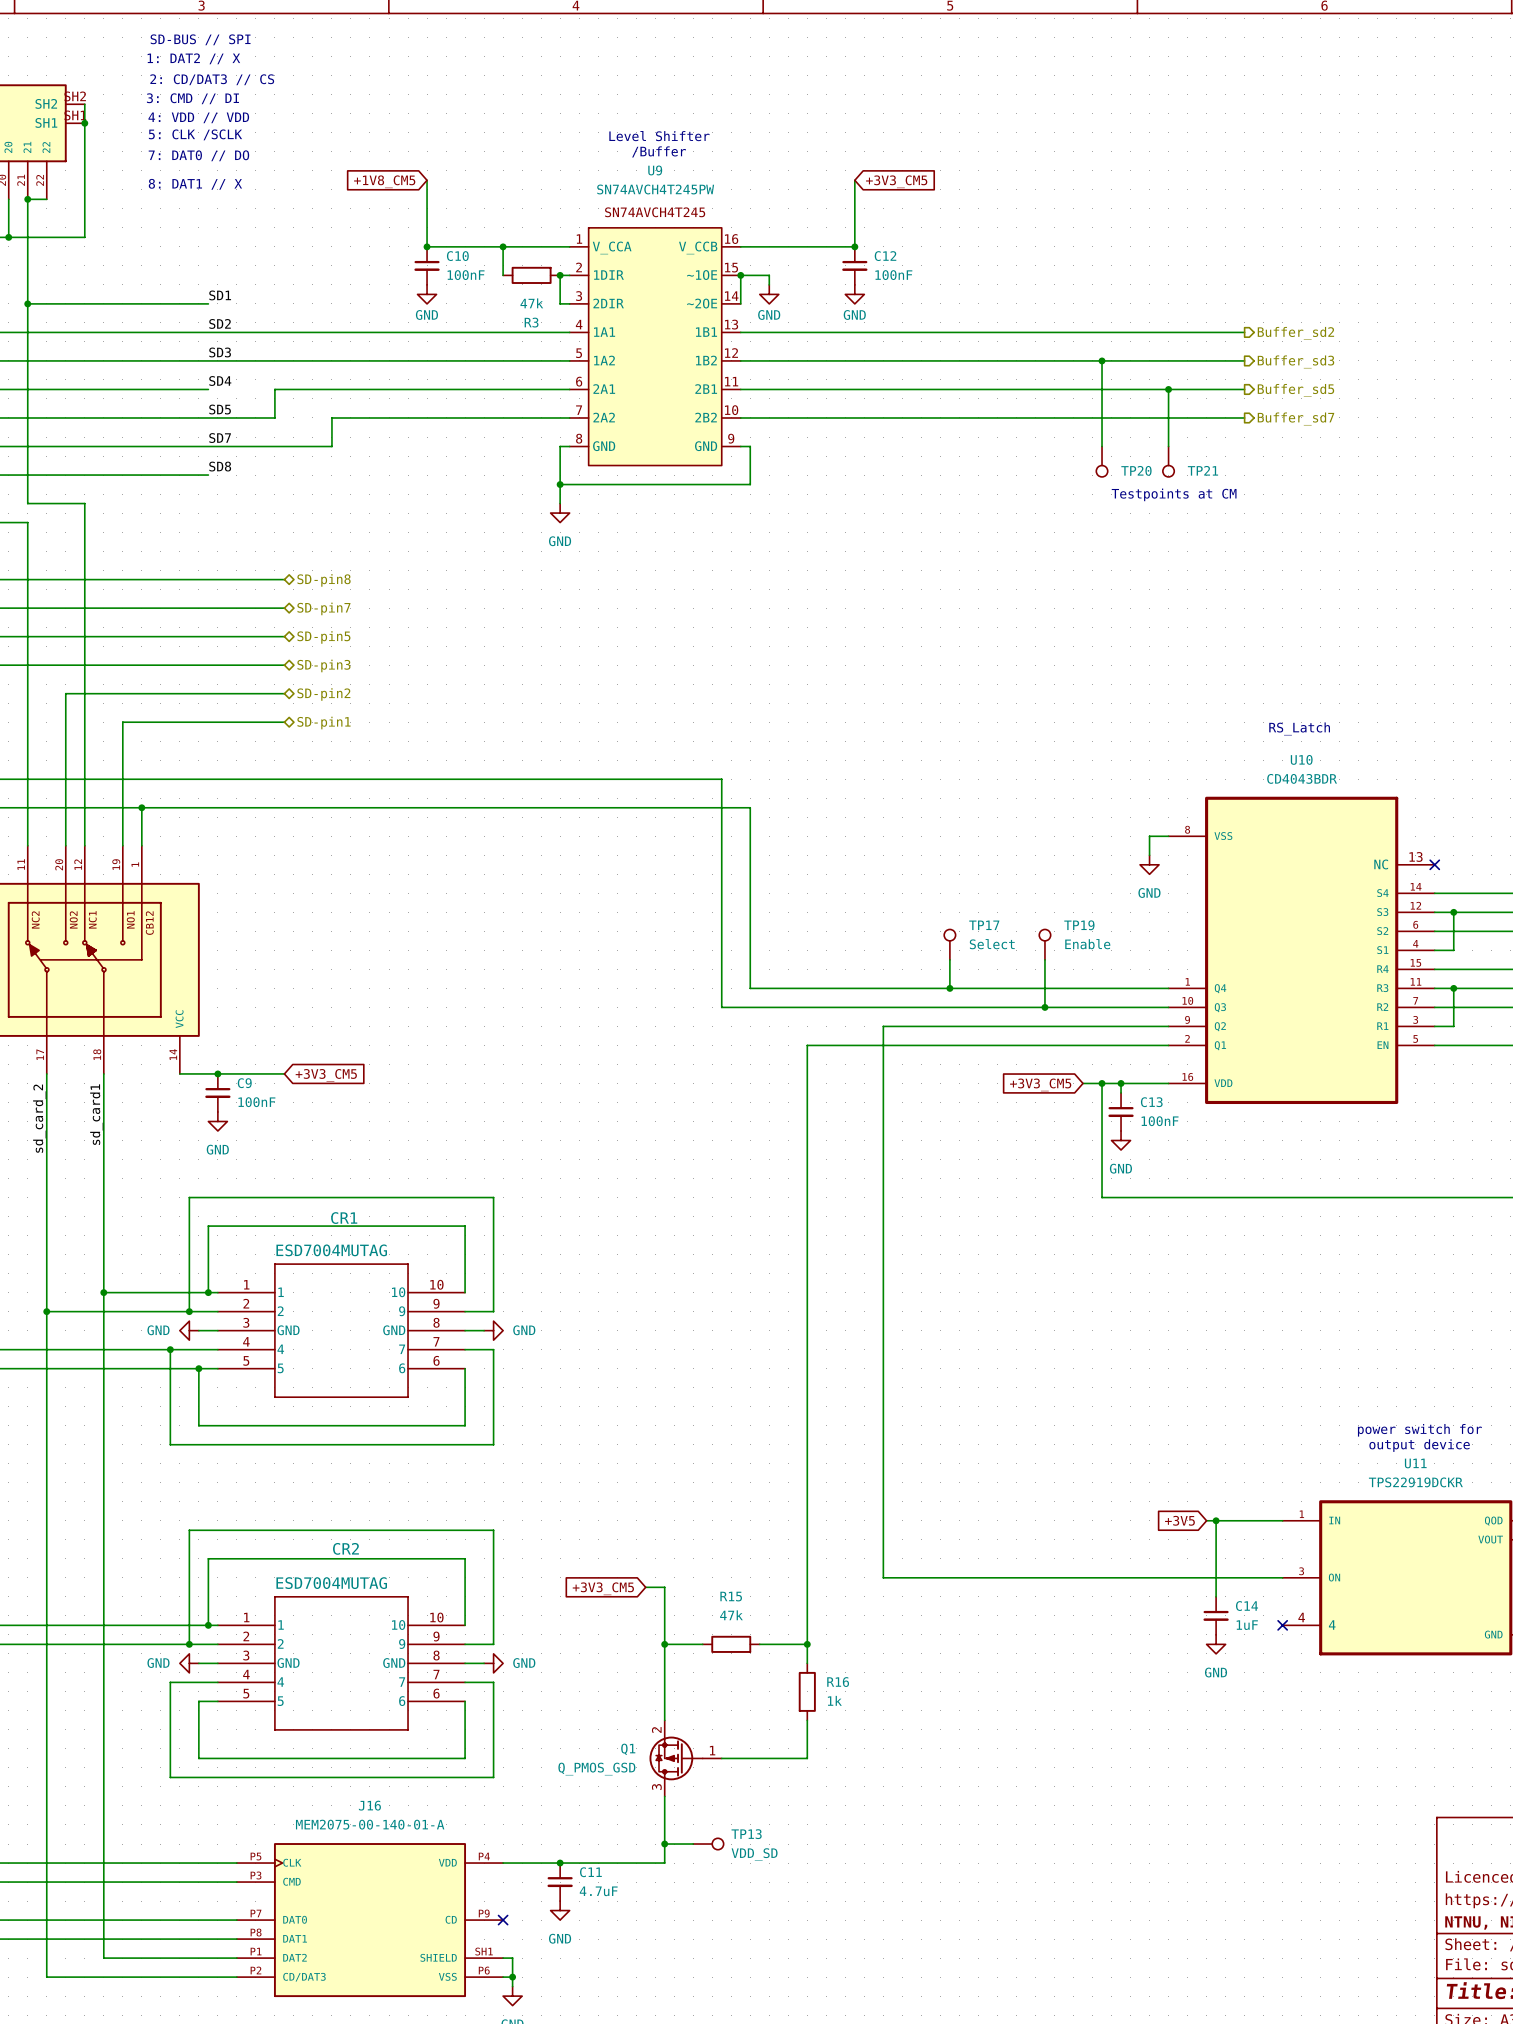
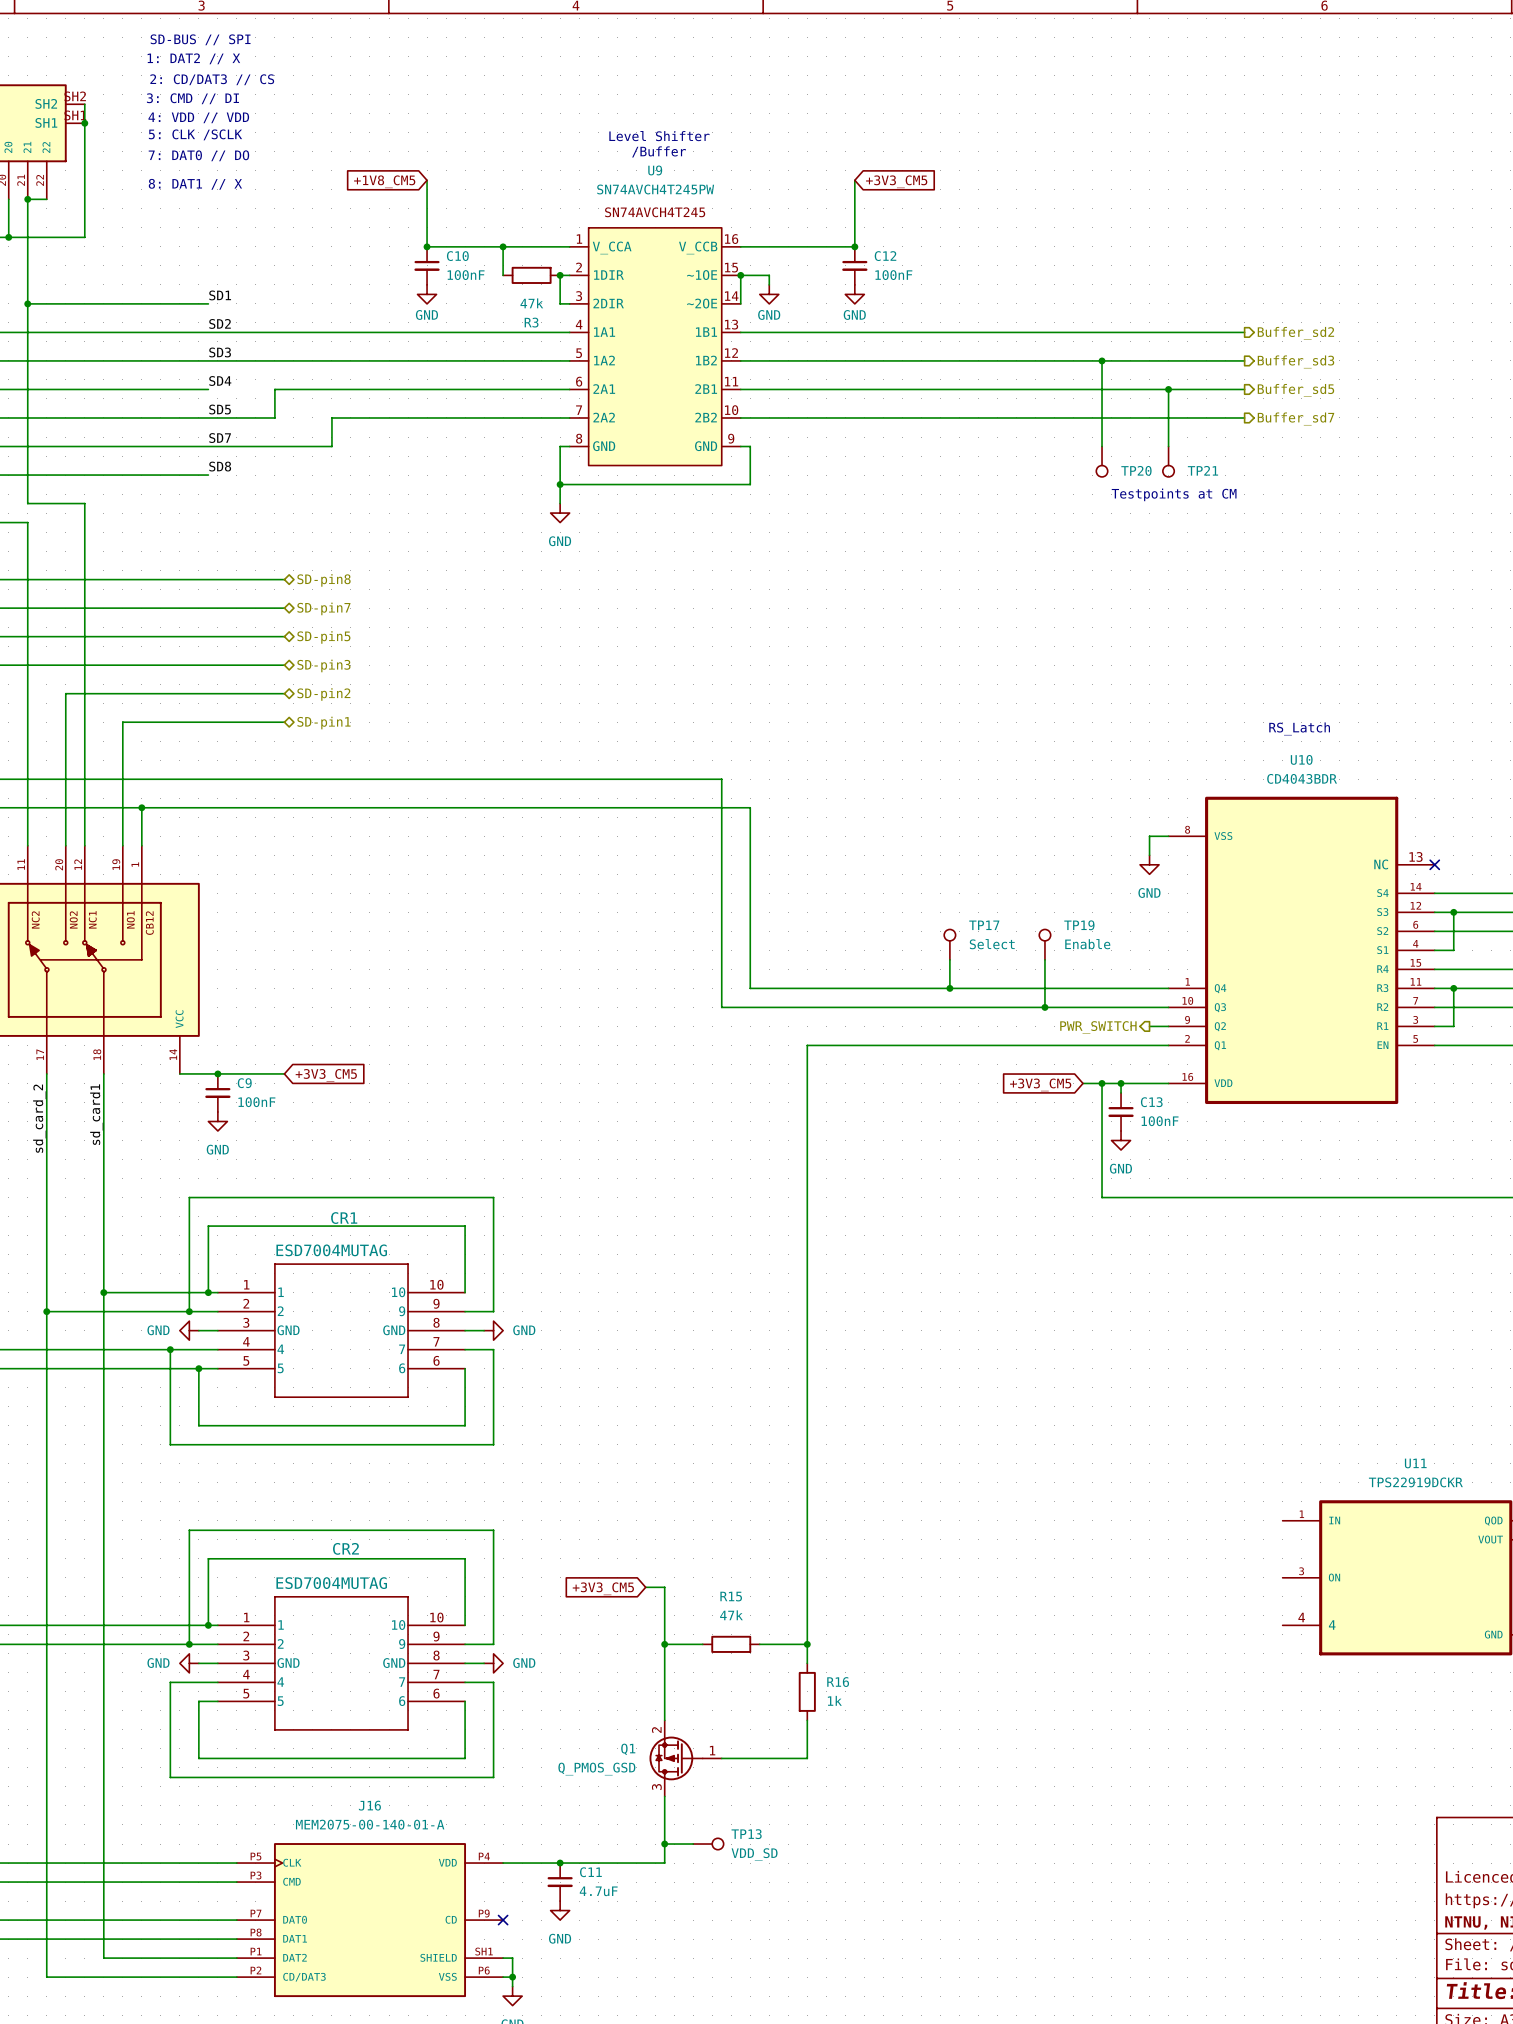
wire: (1149, 1026) (883, 1026) (883, 1577) (1282, 1577) -> none
hierarchical label: none -> PWR_SWITCH (1098, 1027)
text: power switch for (1419, 1430) -> none
text: output device (1419, 1445) -> none
global label: +3V5 (1179, 1520) -> none
wire: (1206, 1520) (1282, 1520) -> none
wire: (1216, 1520) (1216, 1596) -> none
junction: (1216, 1520) -> none
C14: 1uF (1216, 1615) -> none
no-connect mark: (1282, 1625) -> none
power symbol: GND (1216, 1644) -> none

